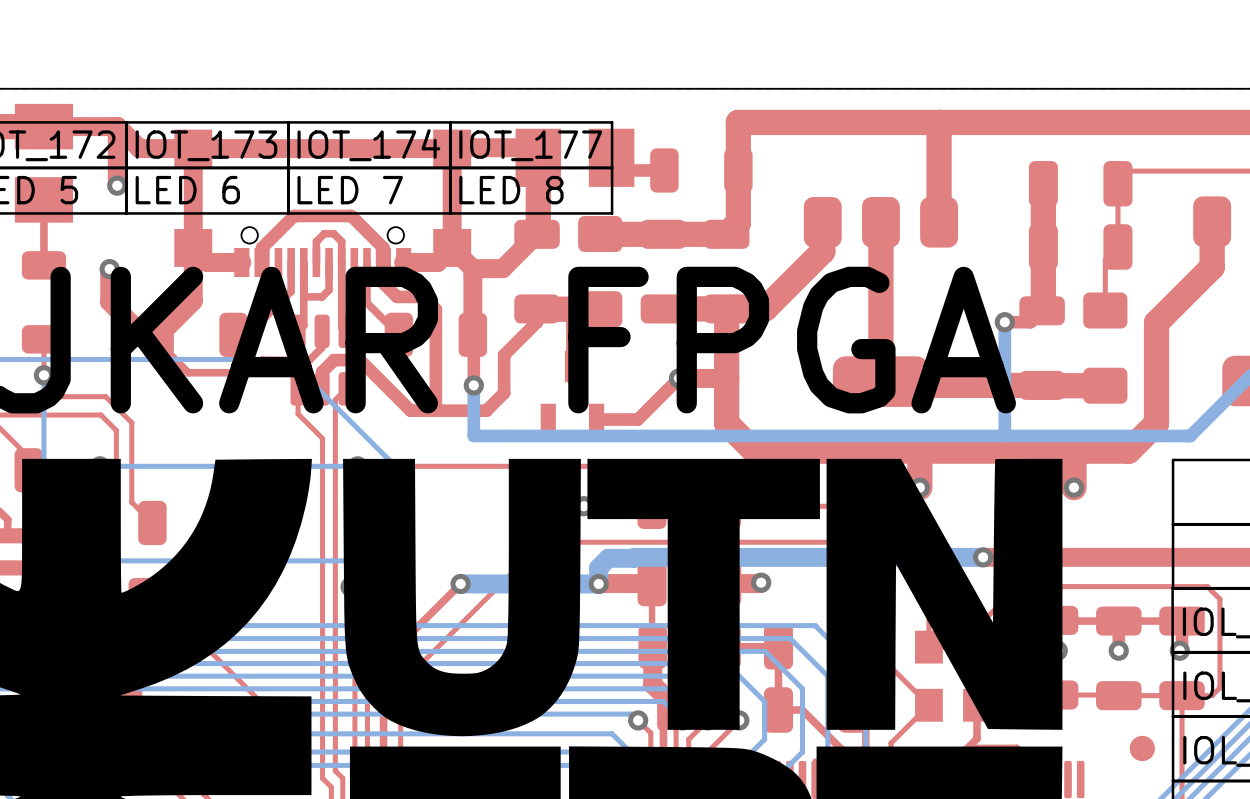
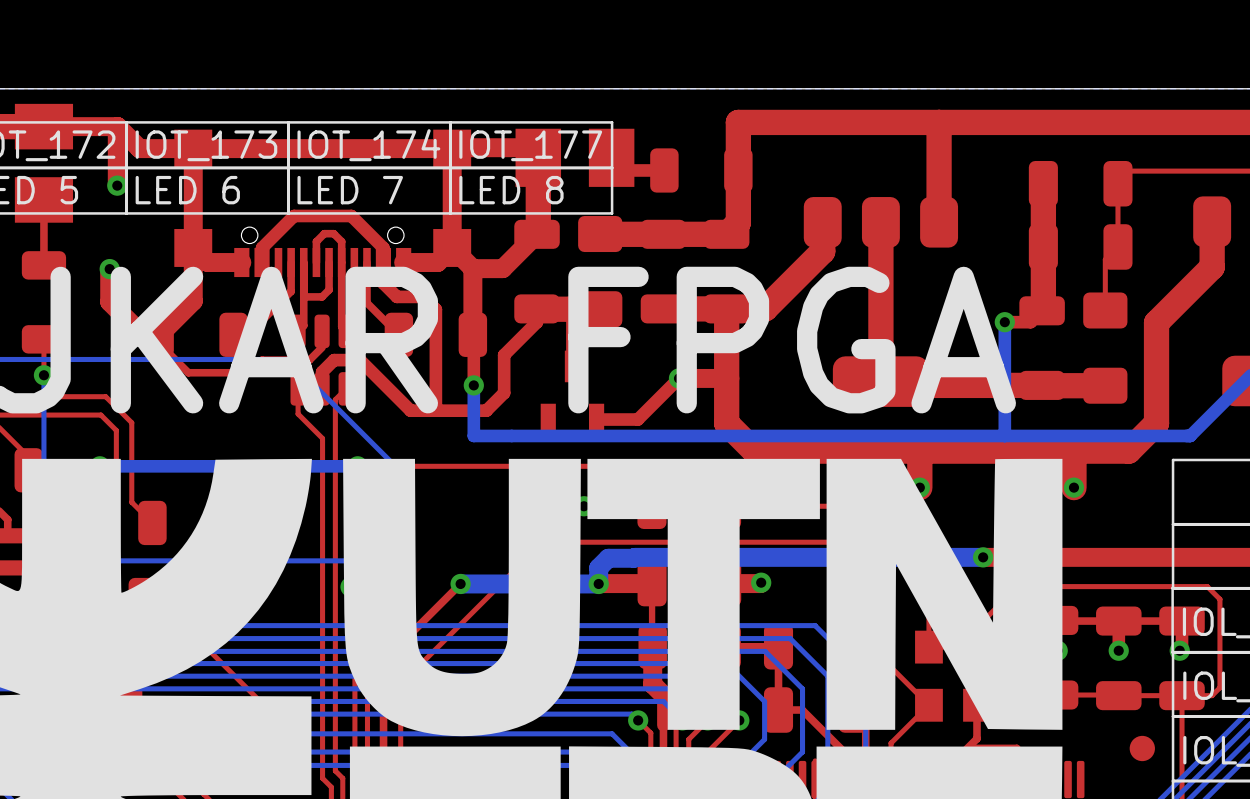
bottom track width: thin (357, 466) (99, 466) -> thick (357, 466) (99, 466)

